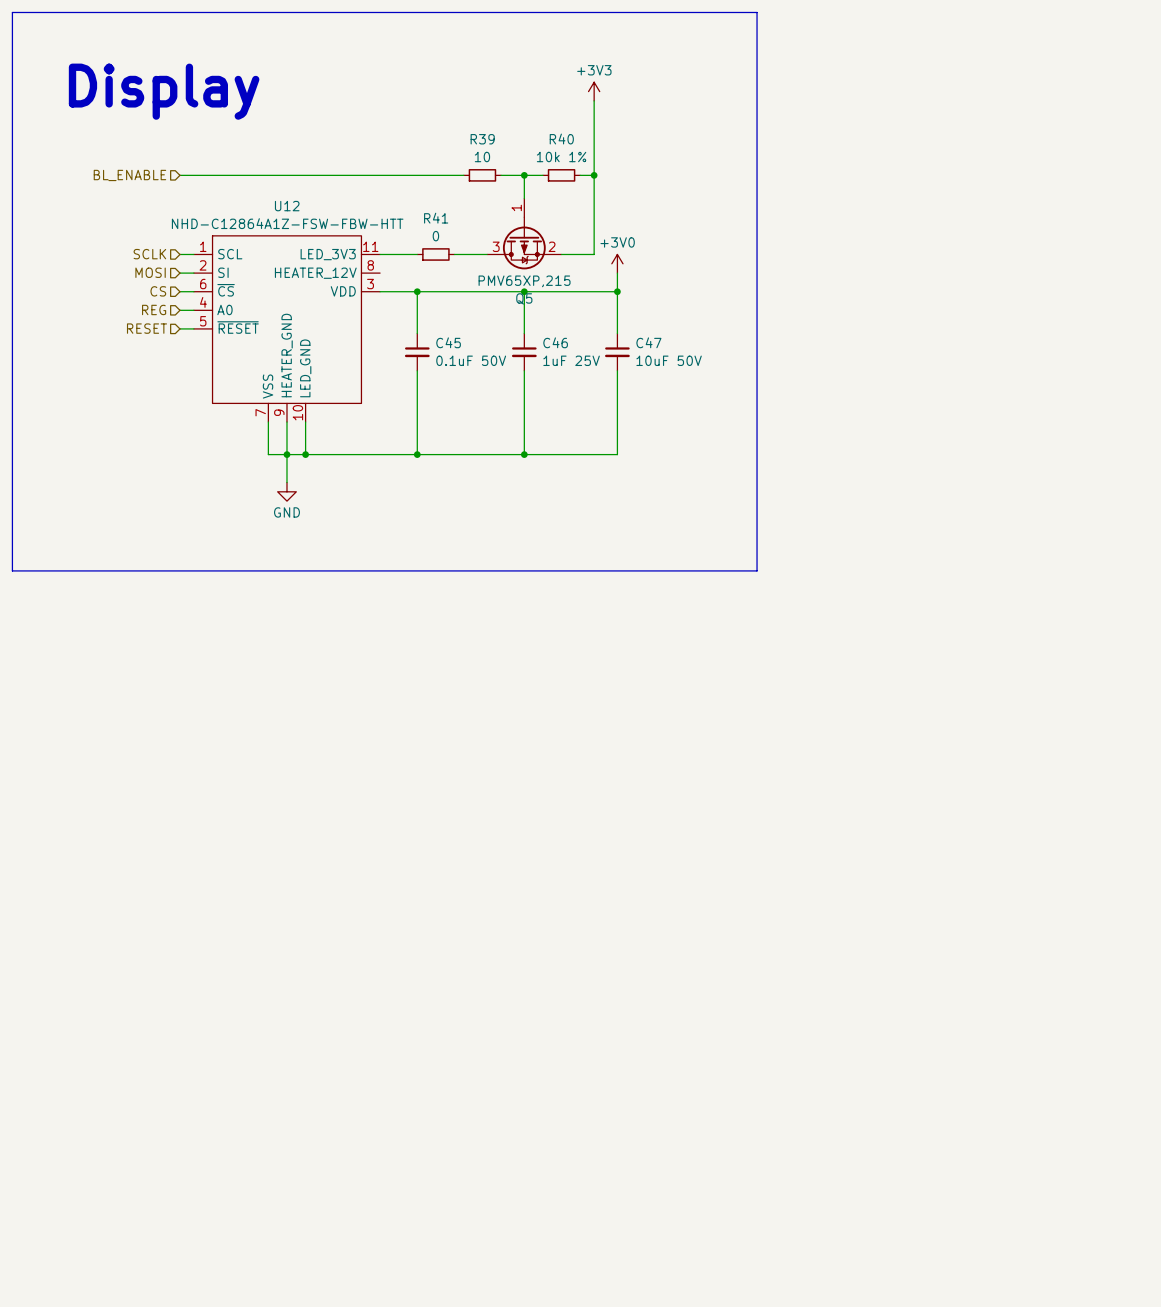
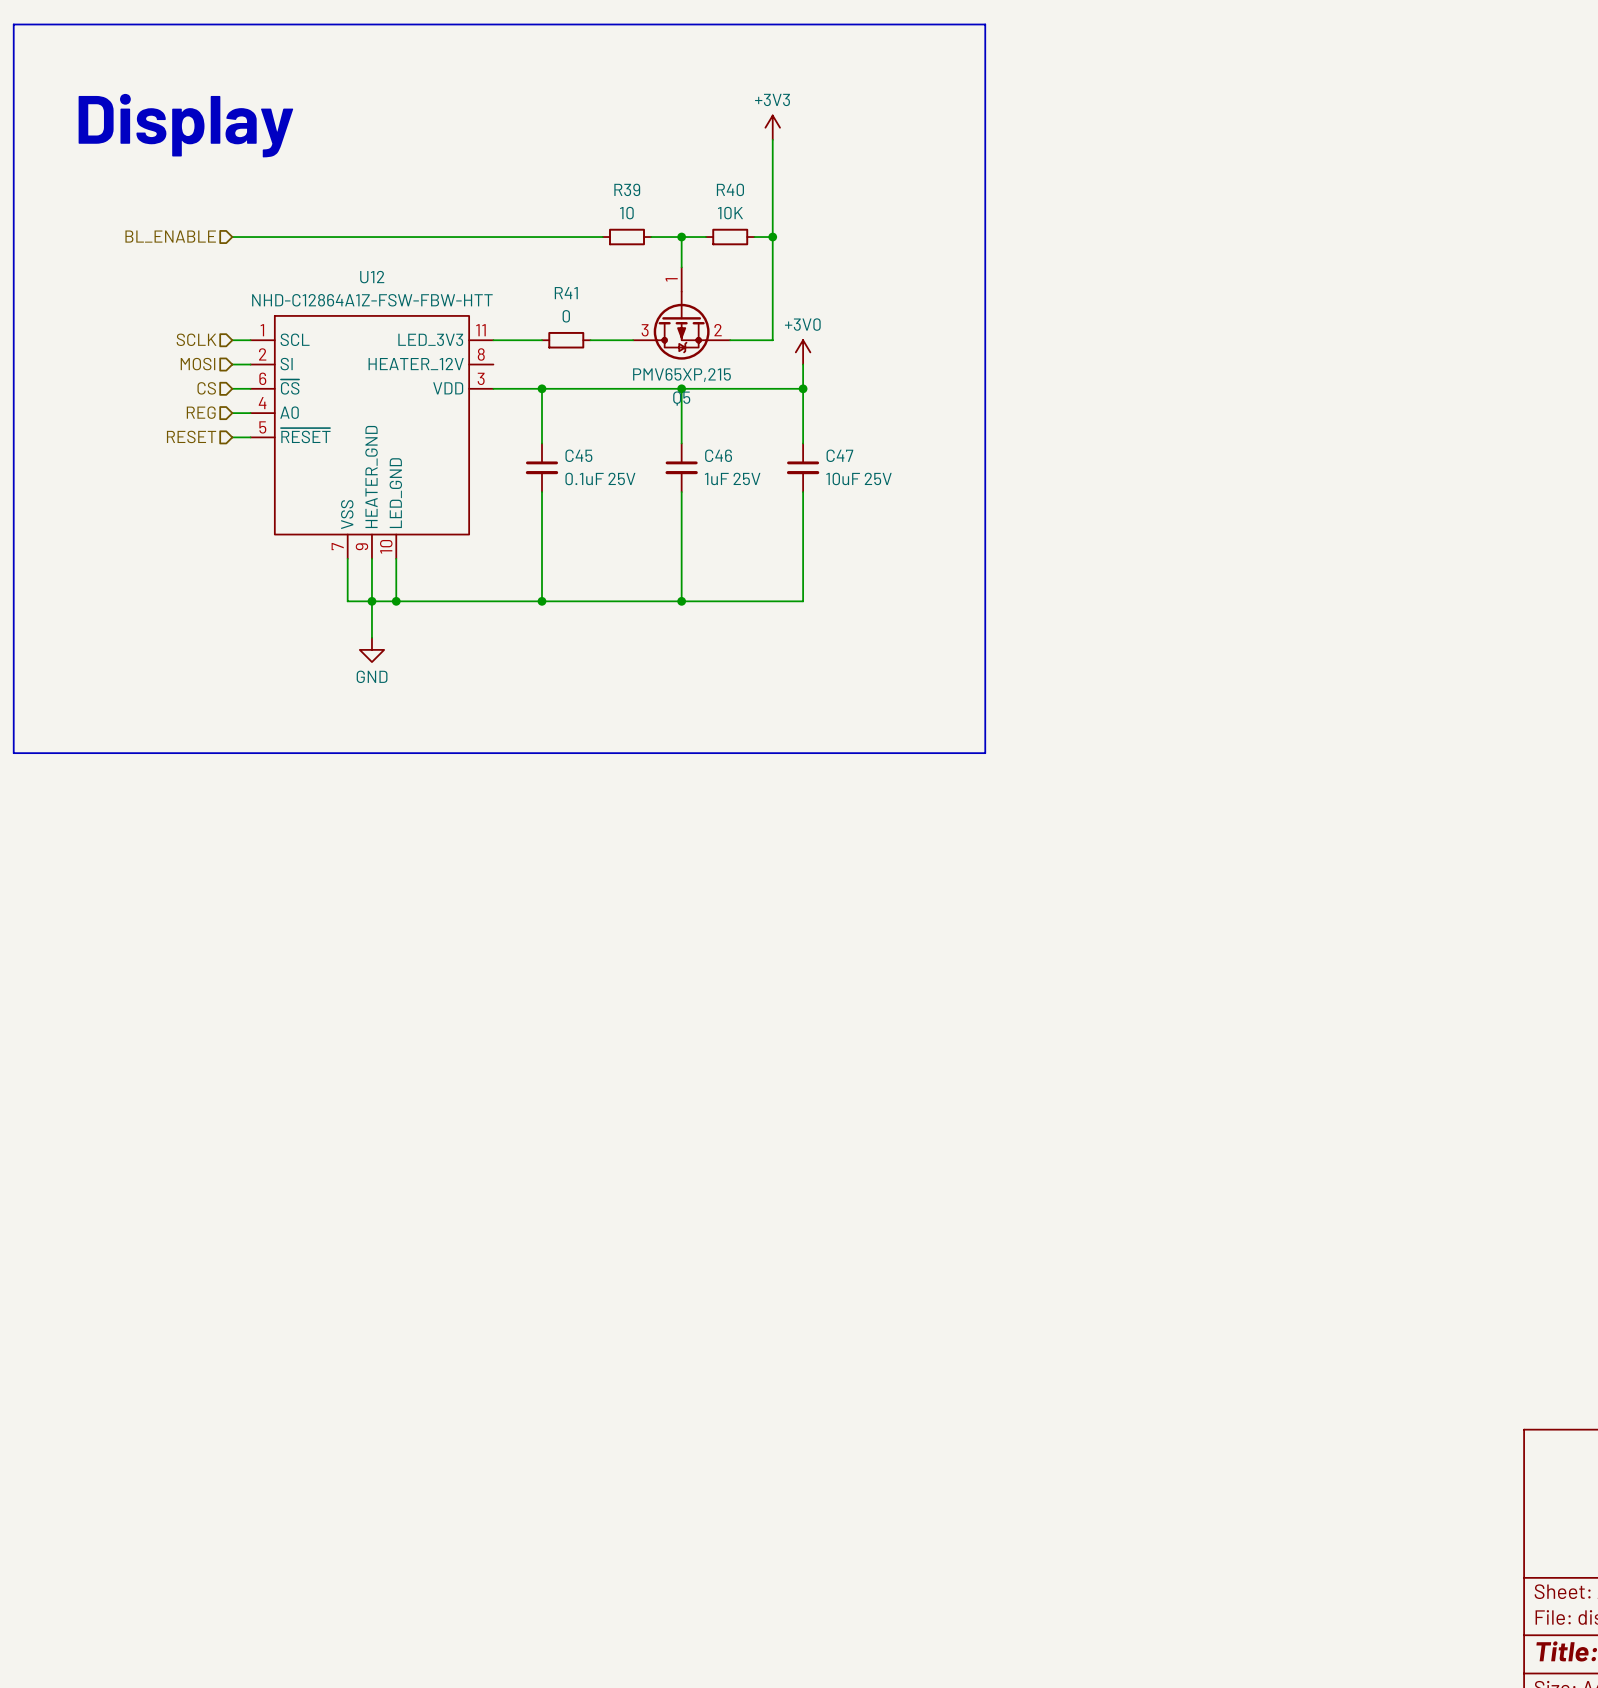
R40 value: 10k 1% (561, 157) -> 10K (730, 213)
C45 value: 0.1uF 50V (471, 360) -> 0.1uF 25V (600, 478)
C47 value: 10uF 50V (669, 360) -> 10uF 25V (858, 478)

